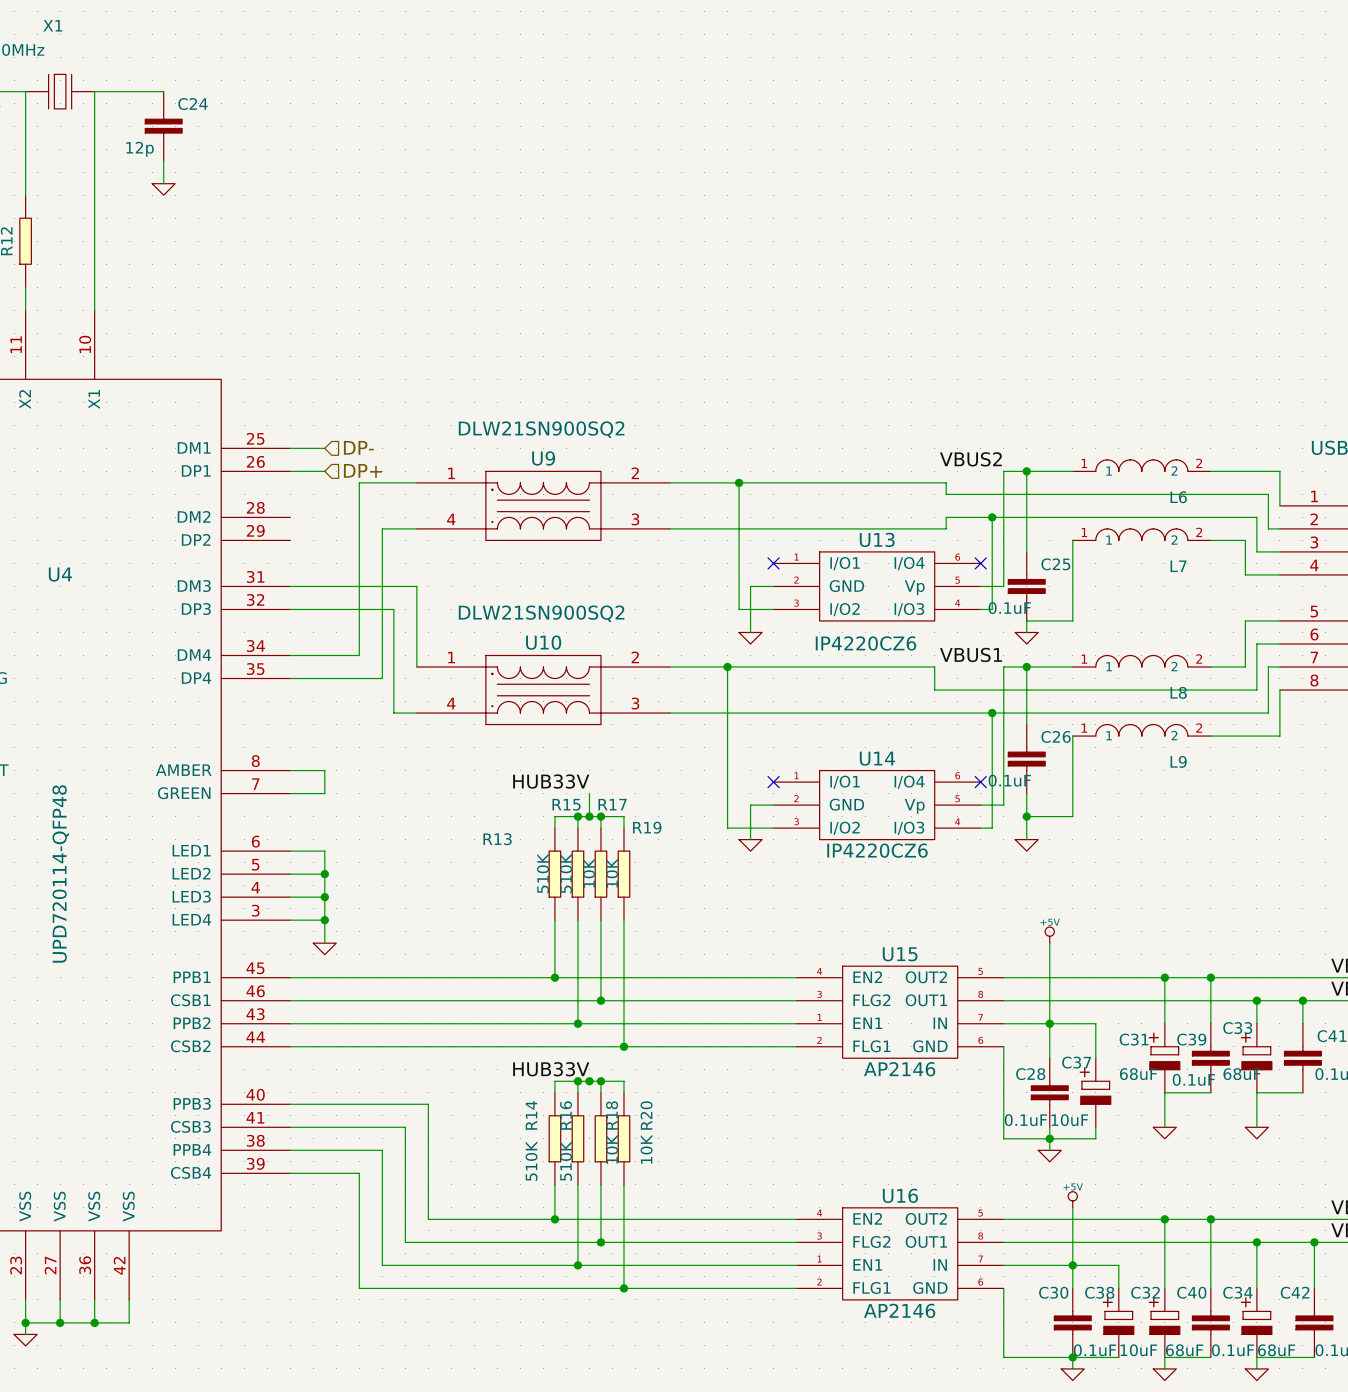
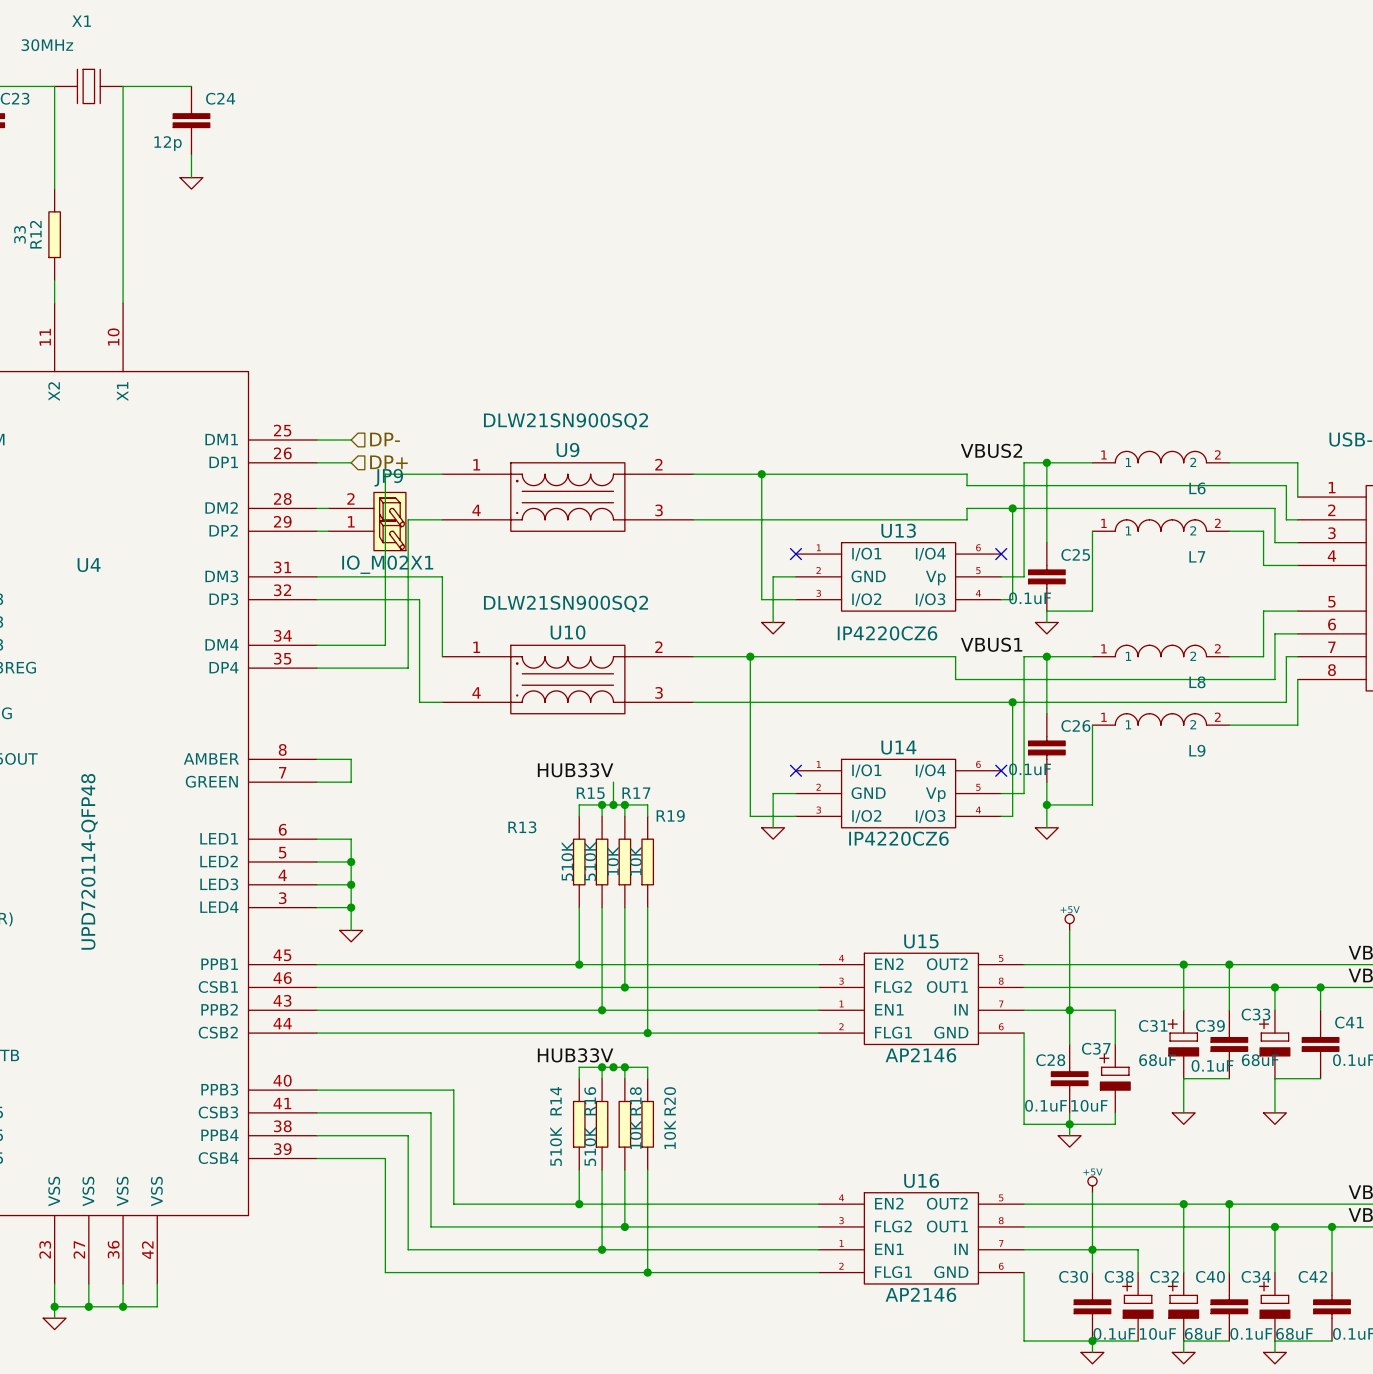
wire: none -> (316, 508) (328, 508)
JP9: none -> IO_M02X1 (367, 521)
wire: none -> (316, 531) (328, 531)

